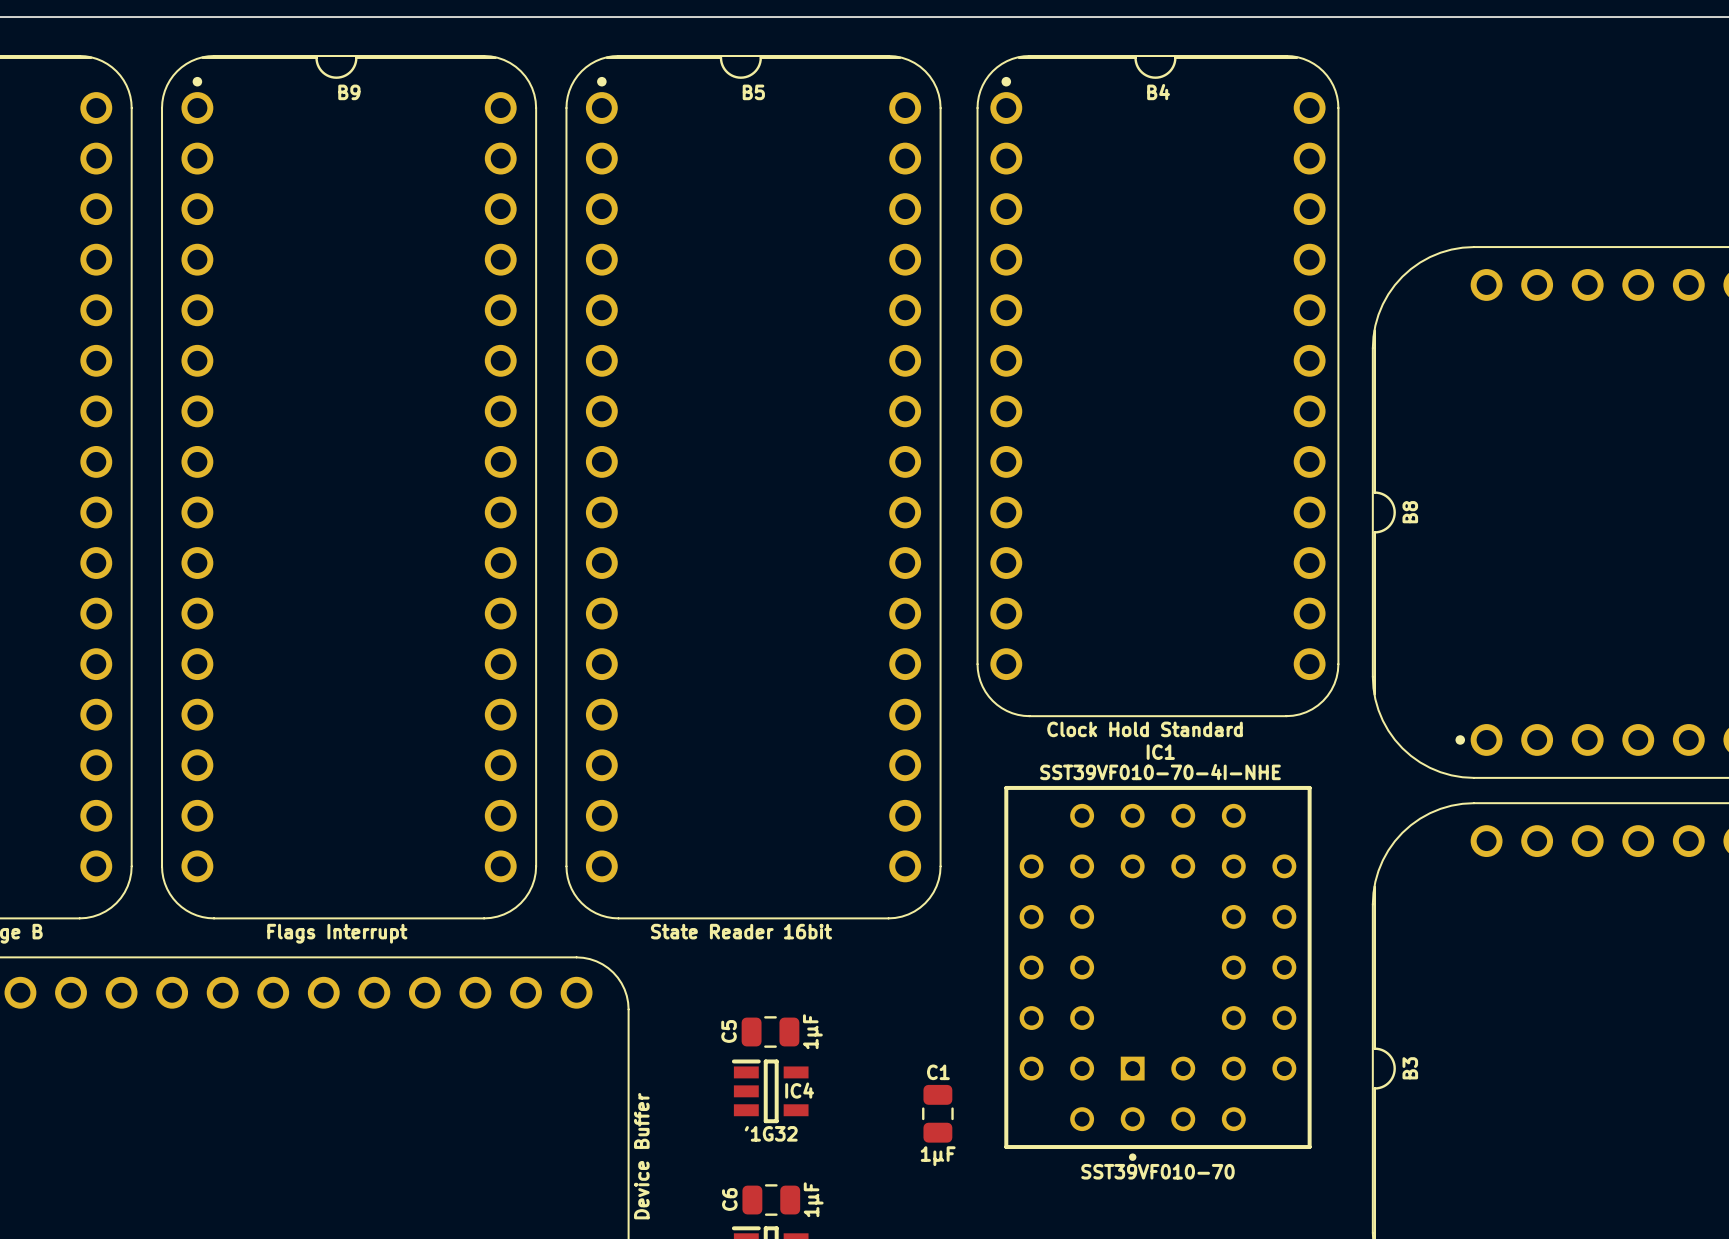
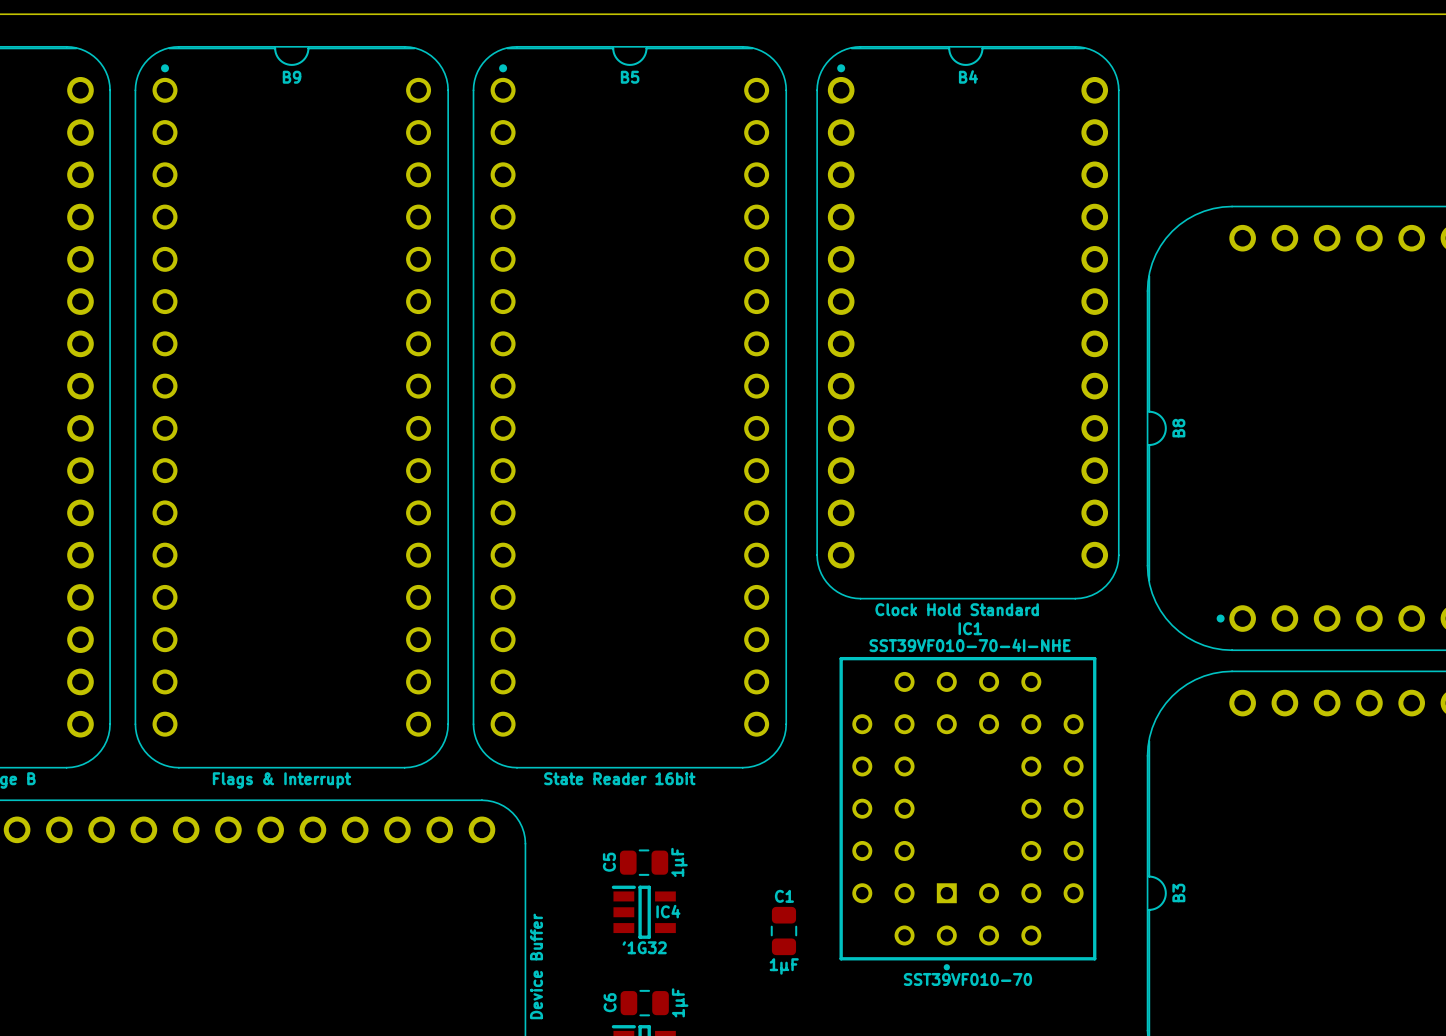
B9 footprint: [161, 55, 538, 920] -> [134, 45, 449, 769]
B5 footprint: [565, 55, 942, 920] -> [472, 45, 788, 769]

